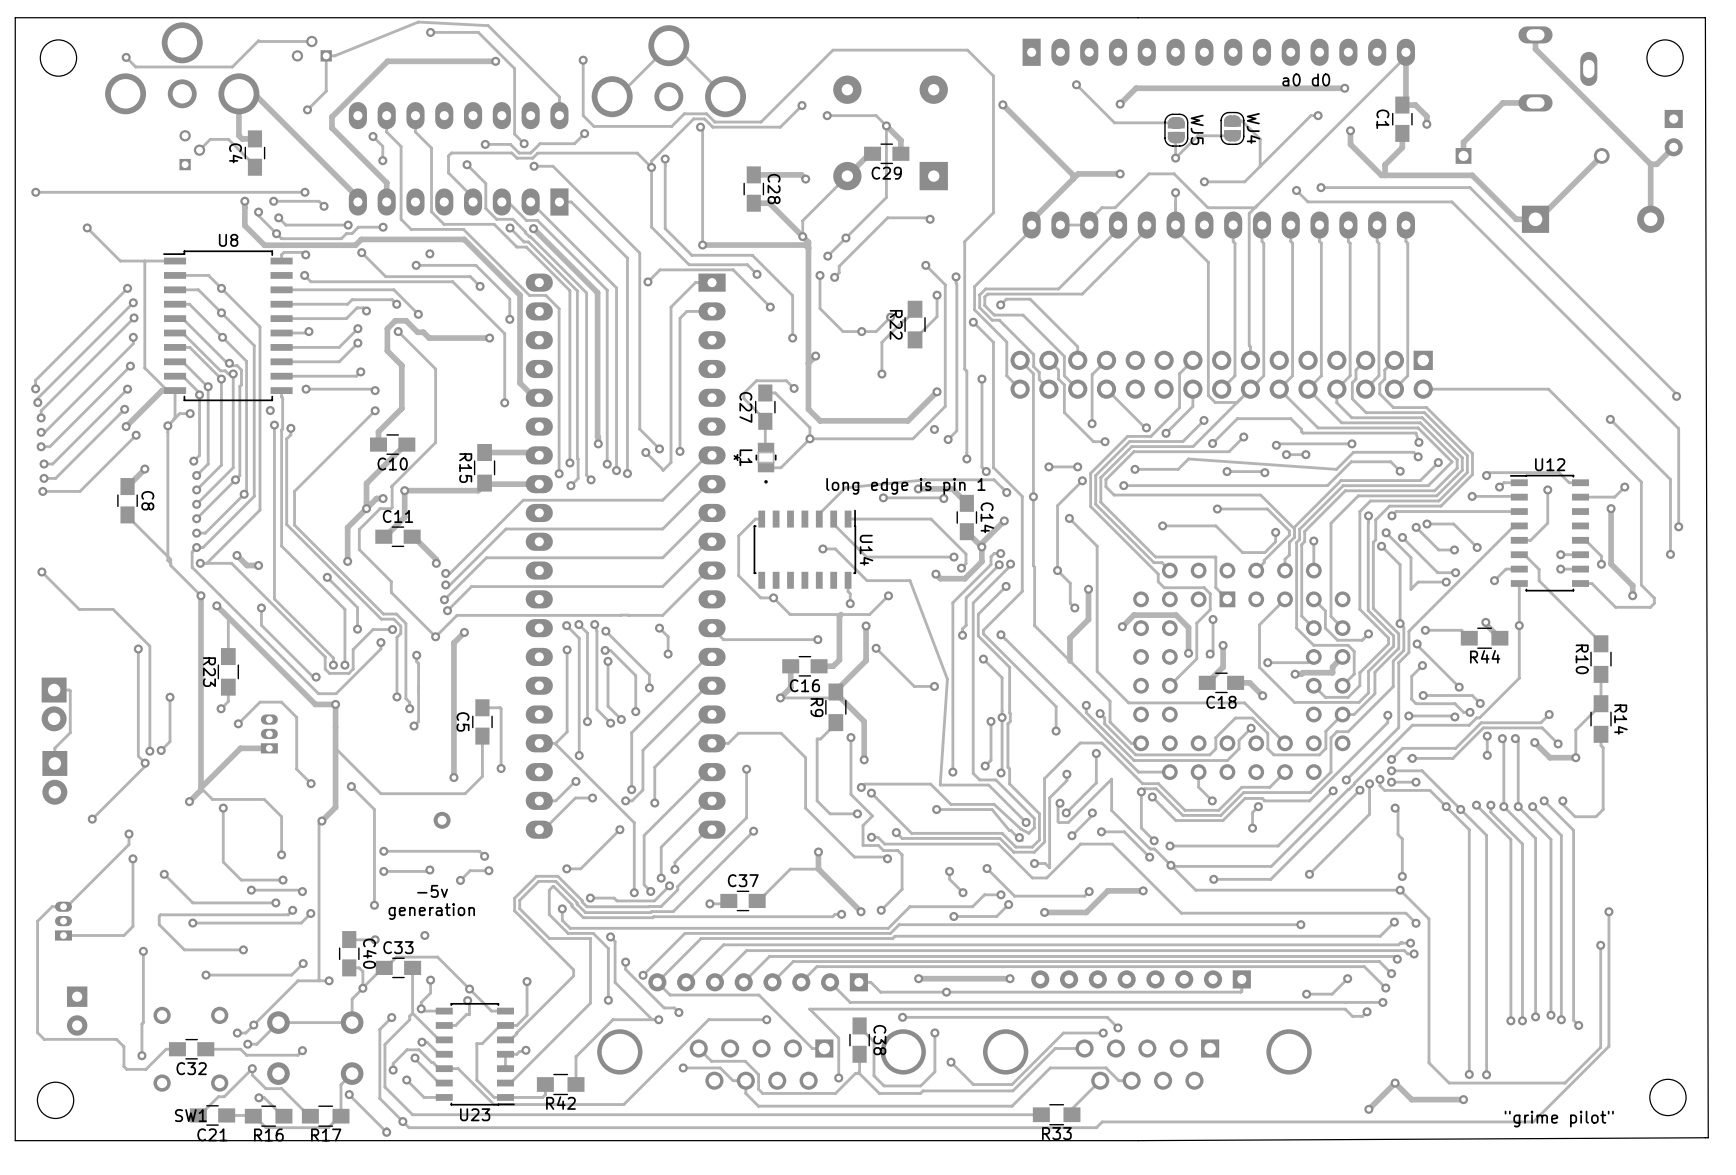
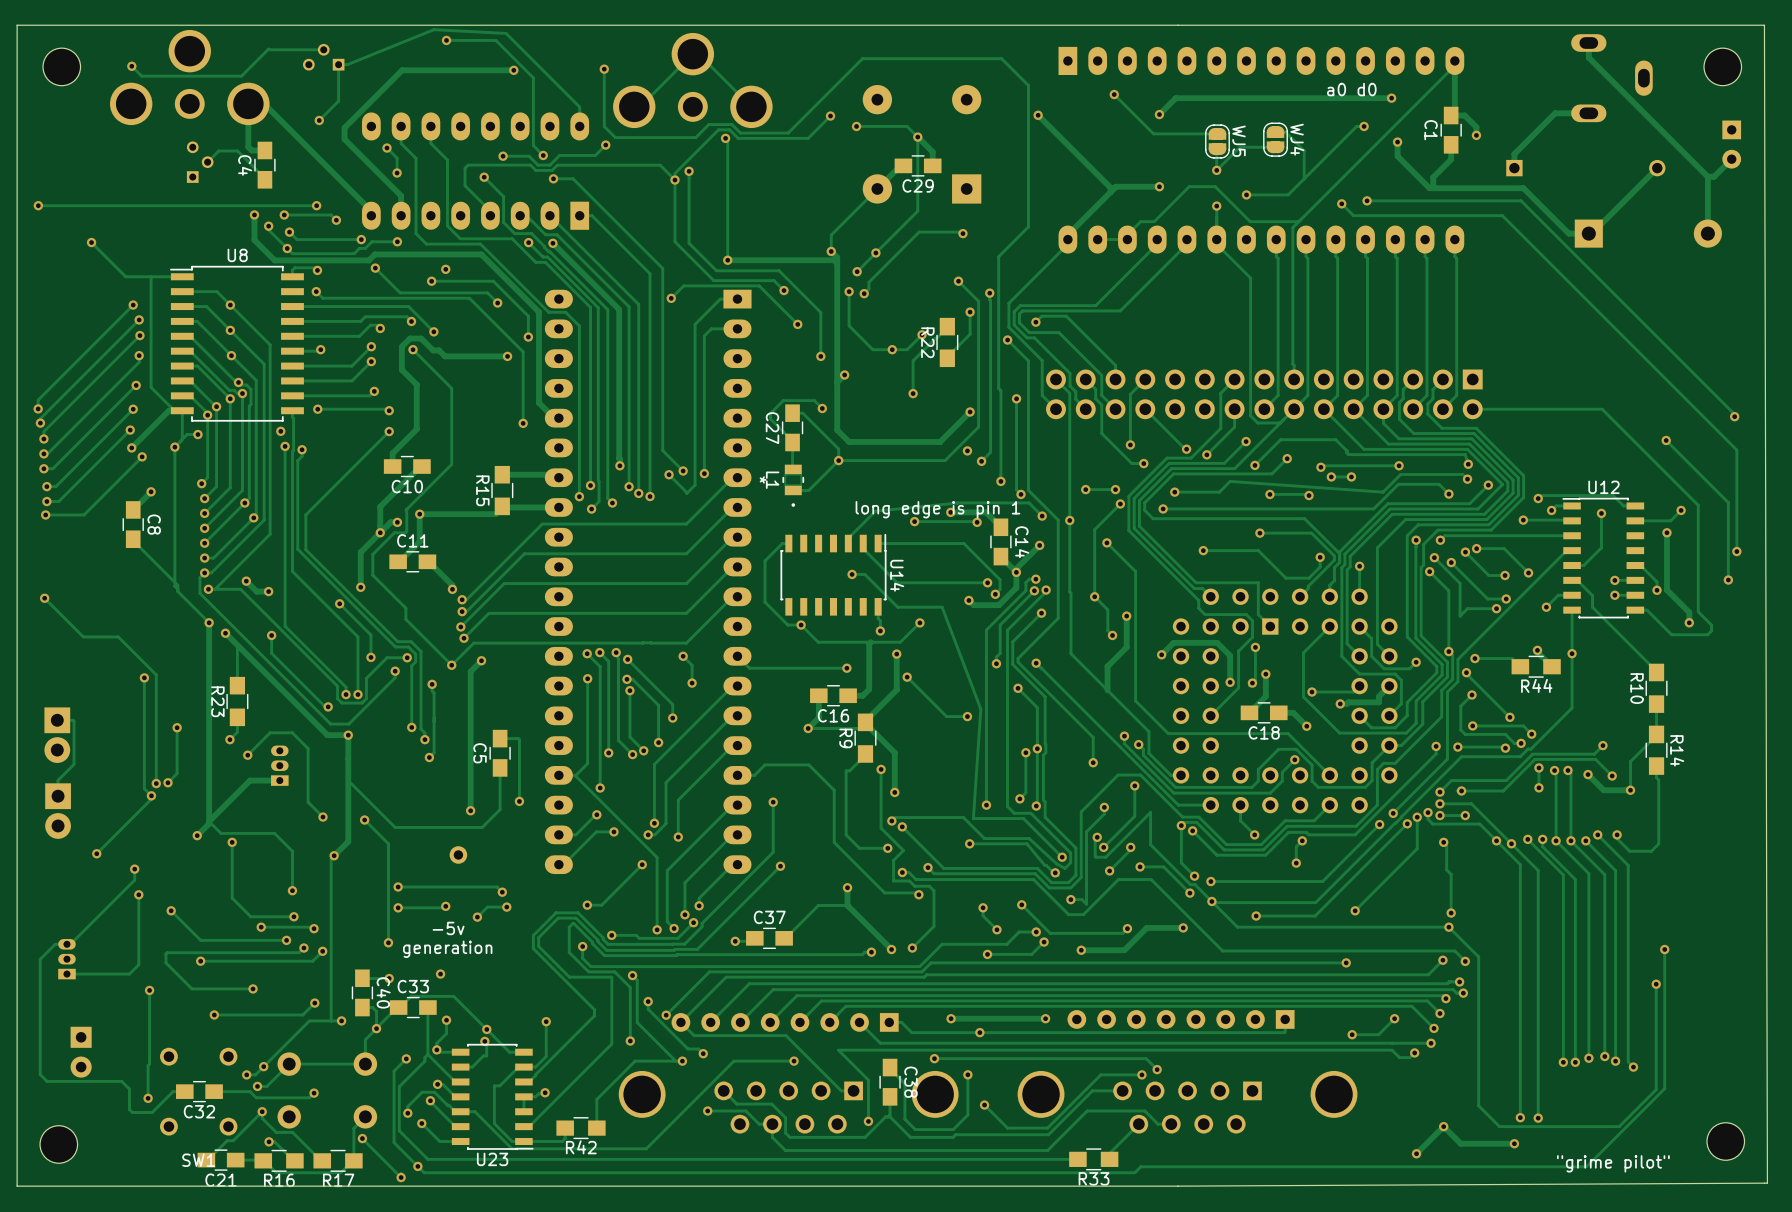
track: (753, 174) (801, 174) (805, 179) -> none
via: (805, 179) -> none
C28: (753, 189) -> none
track: (753, 203) (769, 203) (802, 236) -> none

